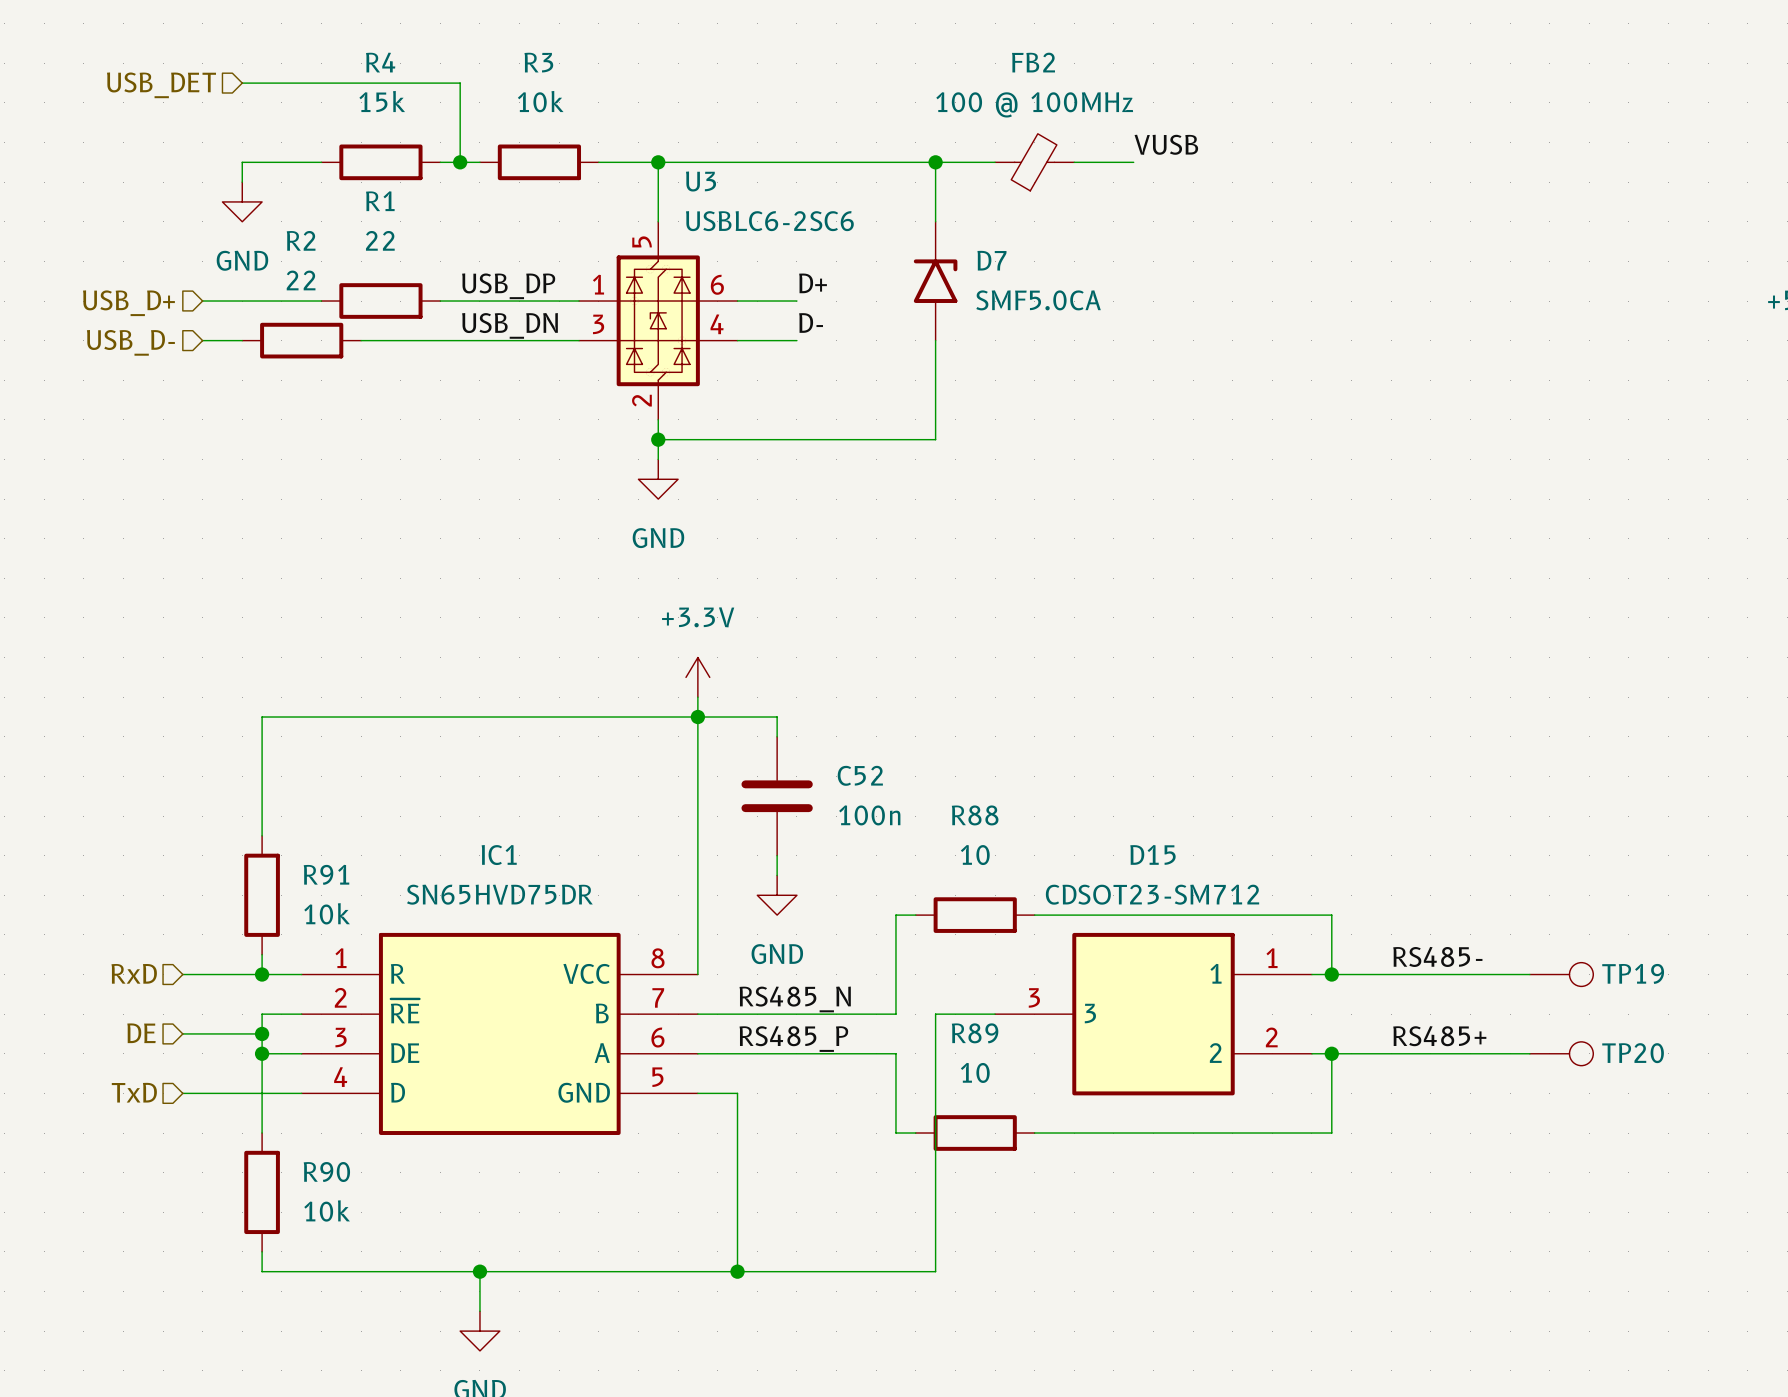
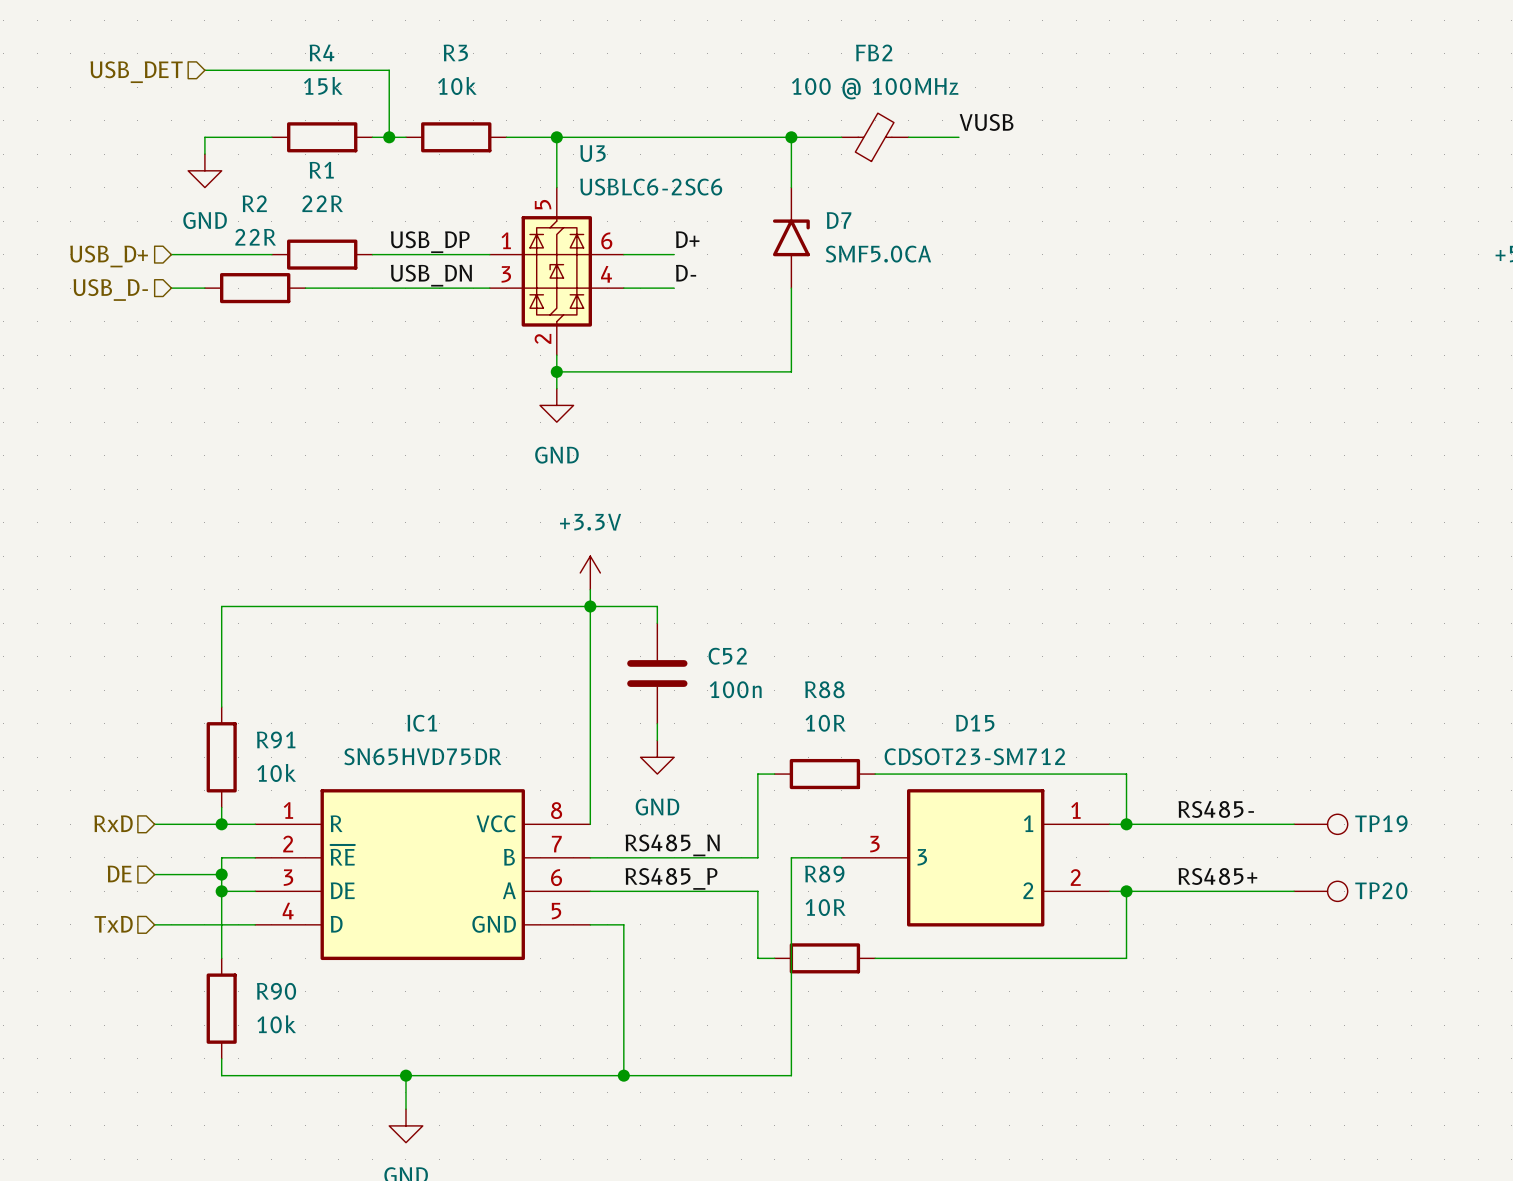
R1 value: 22 (380, 240) -> 22R (322, 203)
R2 value: 22 (301, 280) -> 22R (255, 237)
R88 value: 10 (975, 855) -> 10R (825, 723)
R89 value: 10 (975, 1072) -> 10R (825, 907)

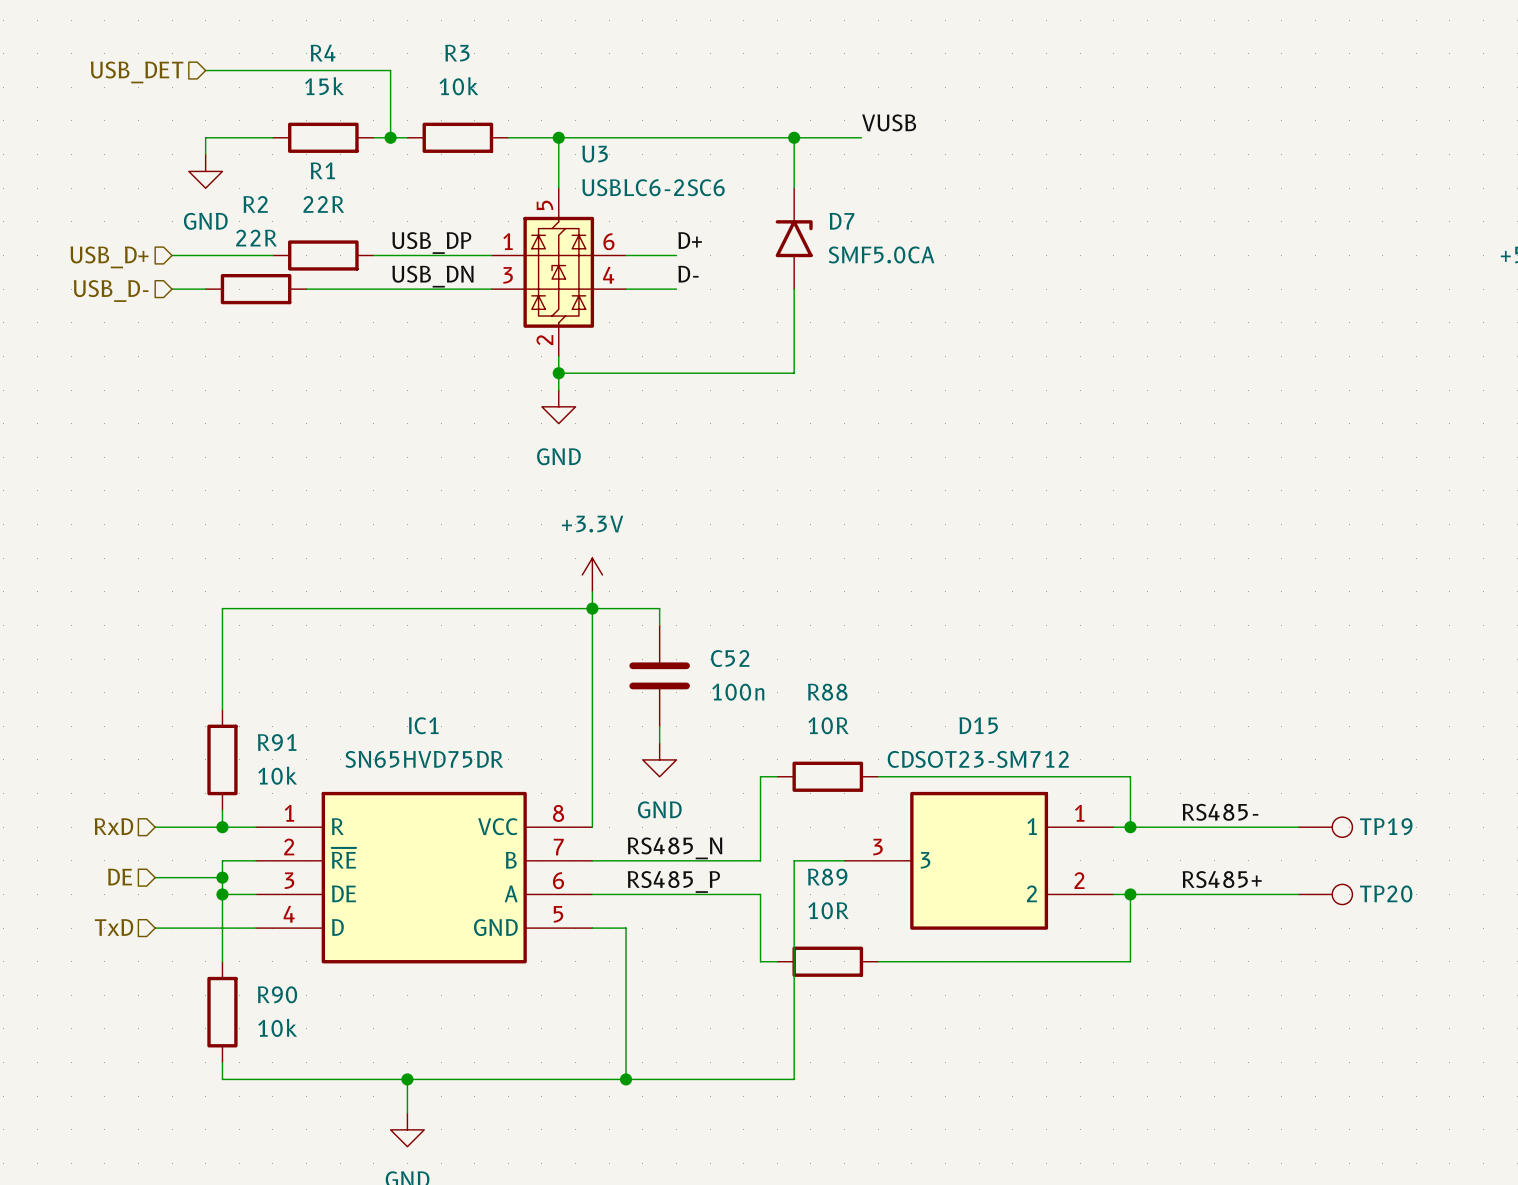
label position: VUSB (986, 122) -> VUSB (889, 122)
FB2: 100 @ 100MHz (875, 137) -> none
wire: (908, 137) (958, 137) -> none

